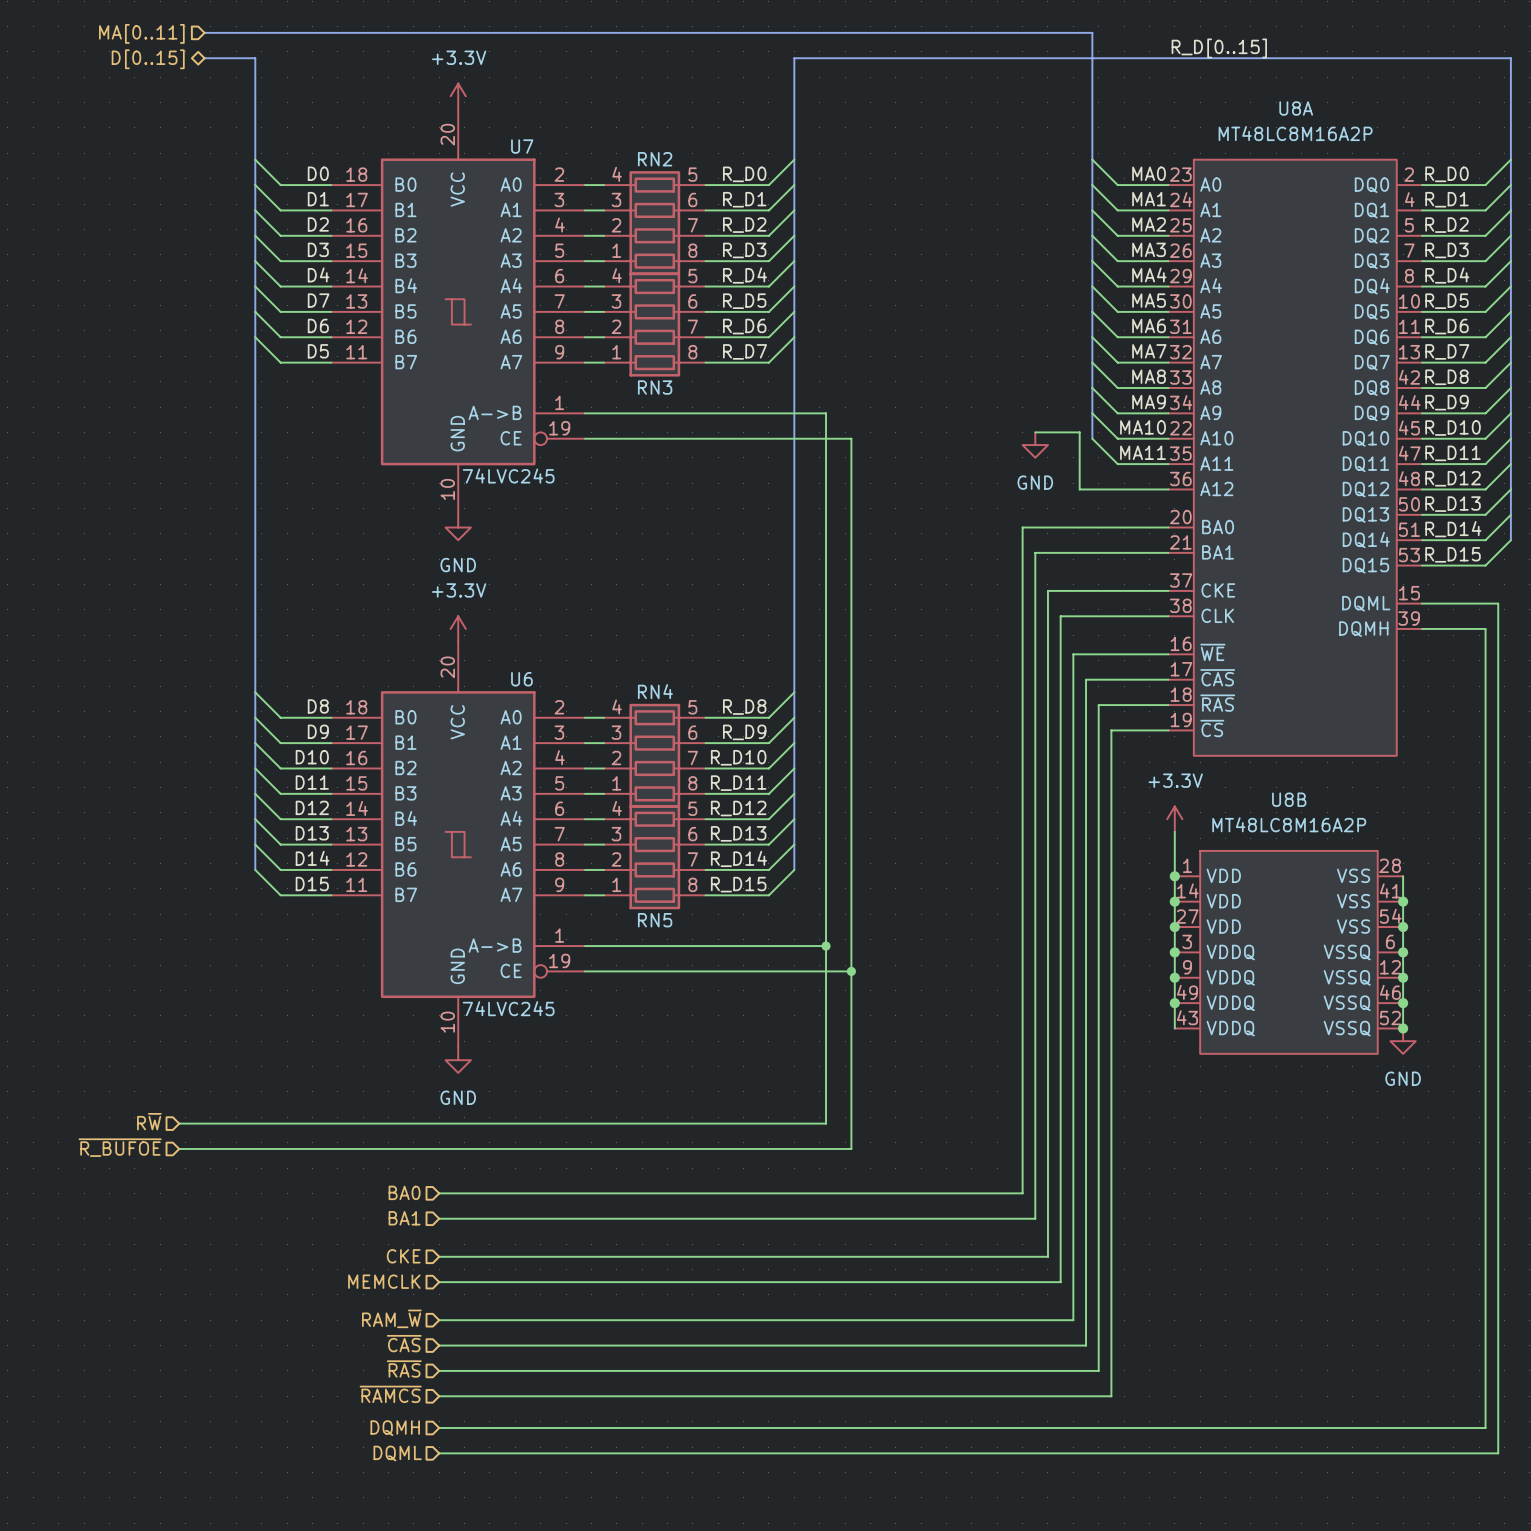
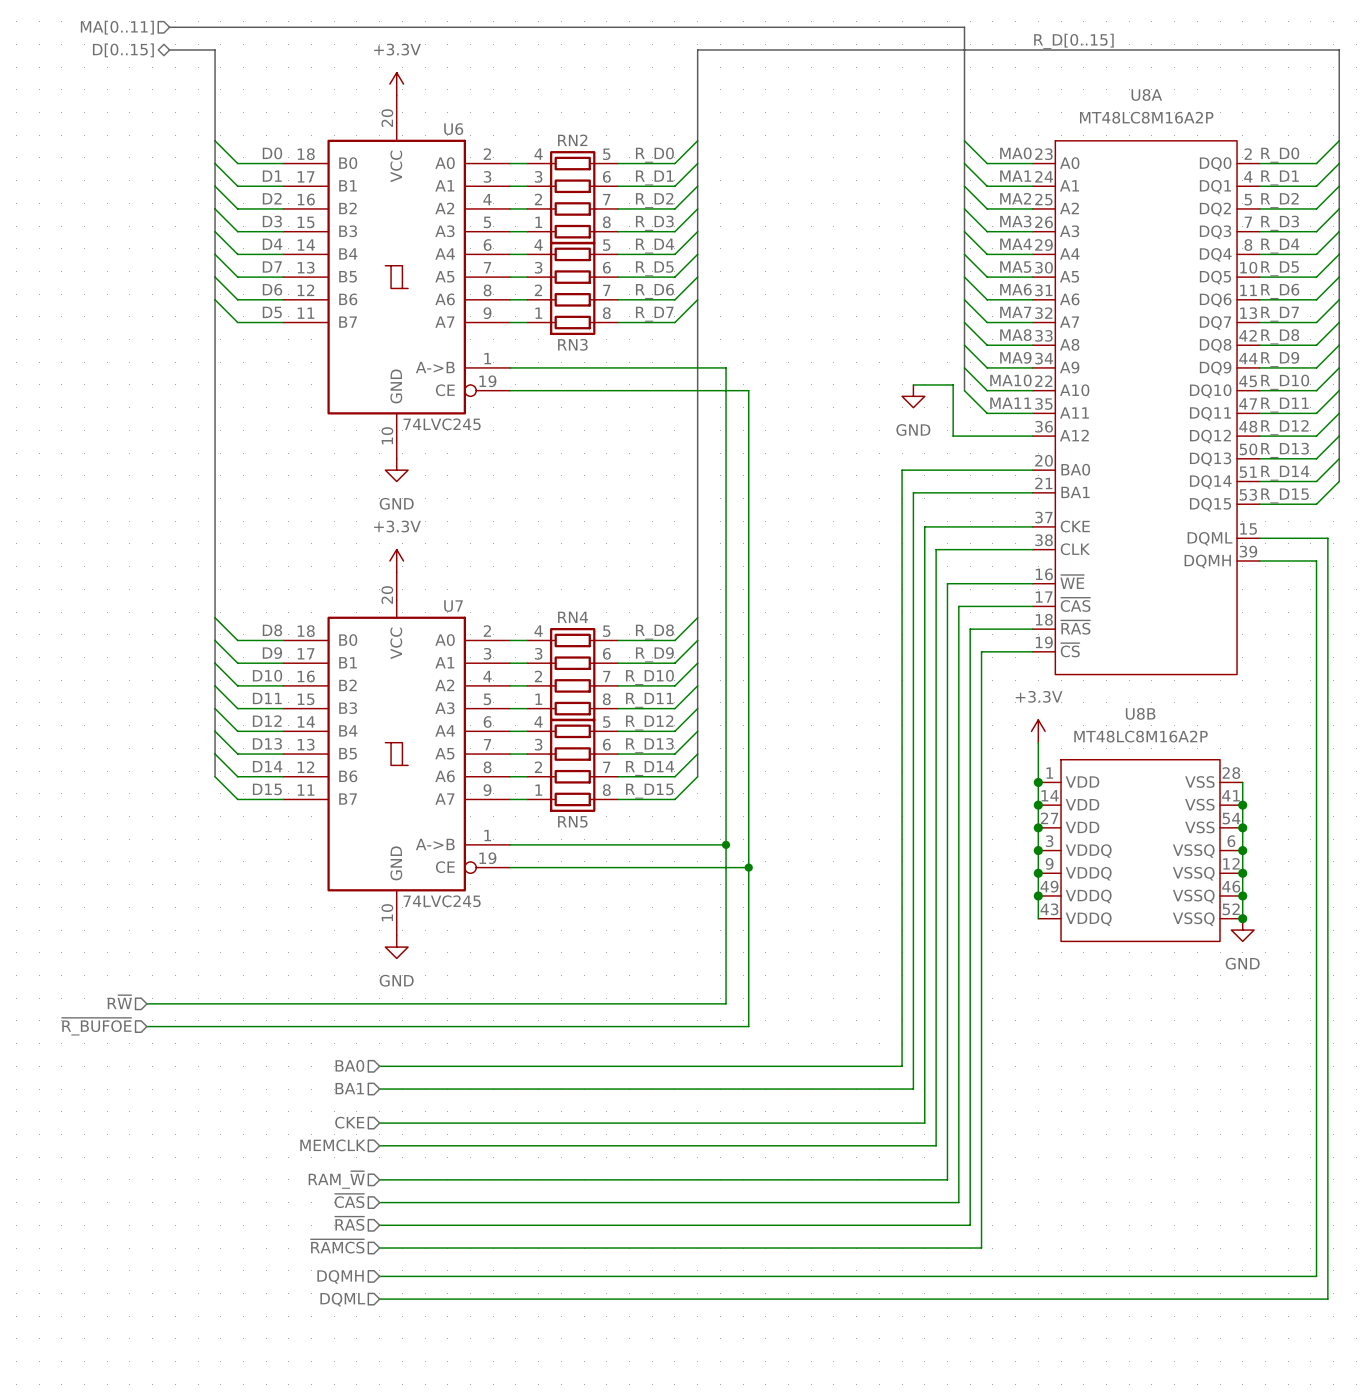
U7 name: U7 (522, 146) -> U6 (453, 129)
U6 name: U6 (521, 679) -> U7 (453, 606)

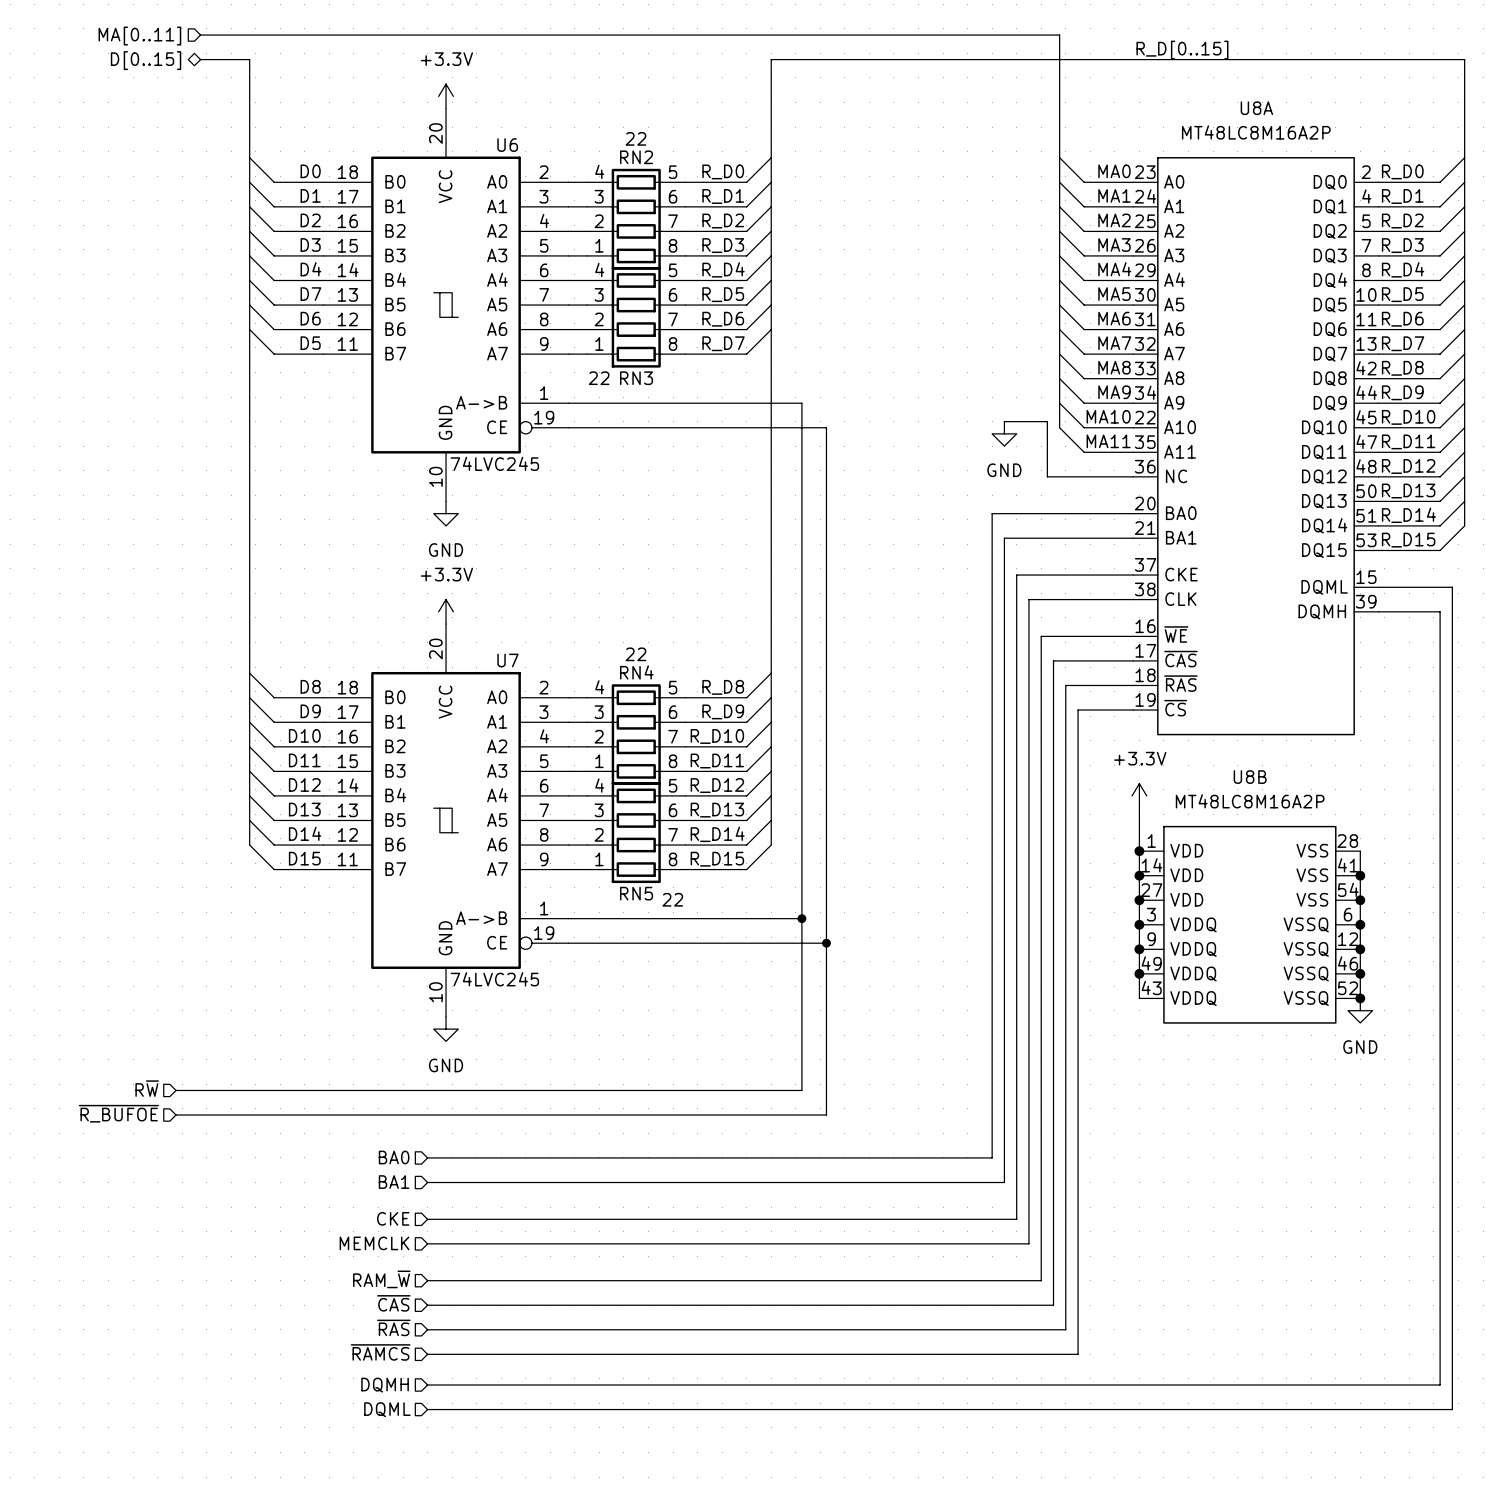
RN2 value: none -> 22 (635, 138)
RN3 value: none -> 22 (599, 378)
U8A pin name: A12 (1074, 435) -> NC (1176, 476)
RN4 value: none -> 22 (635, 654)
RN5 value: none -> 22 (672, 899)

